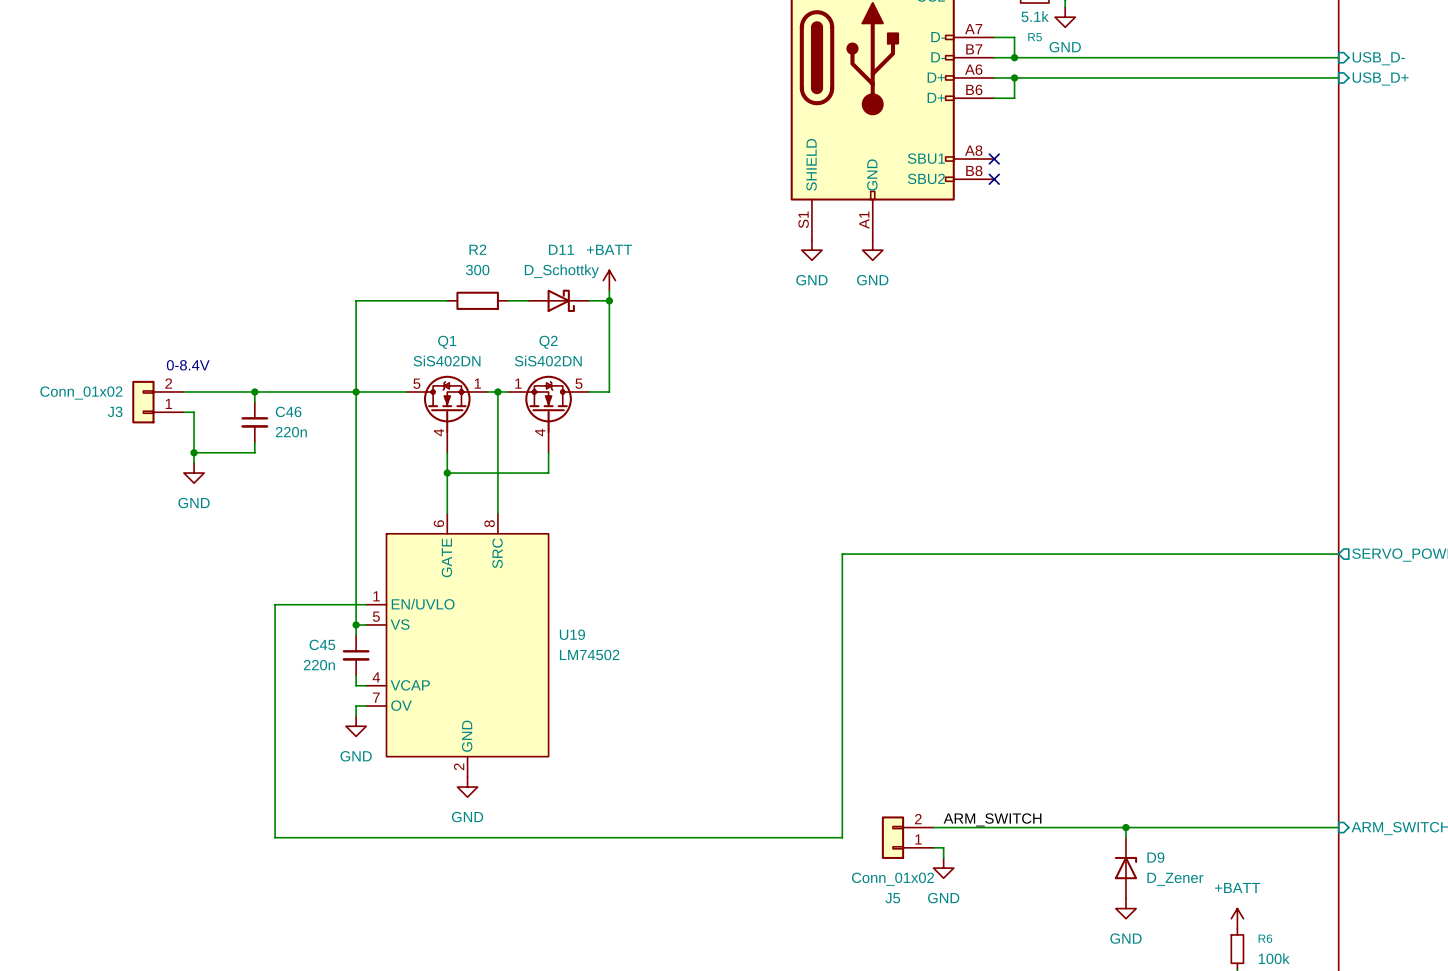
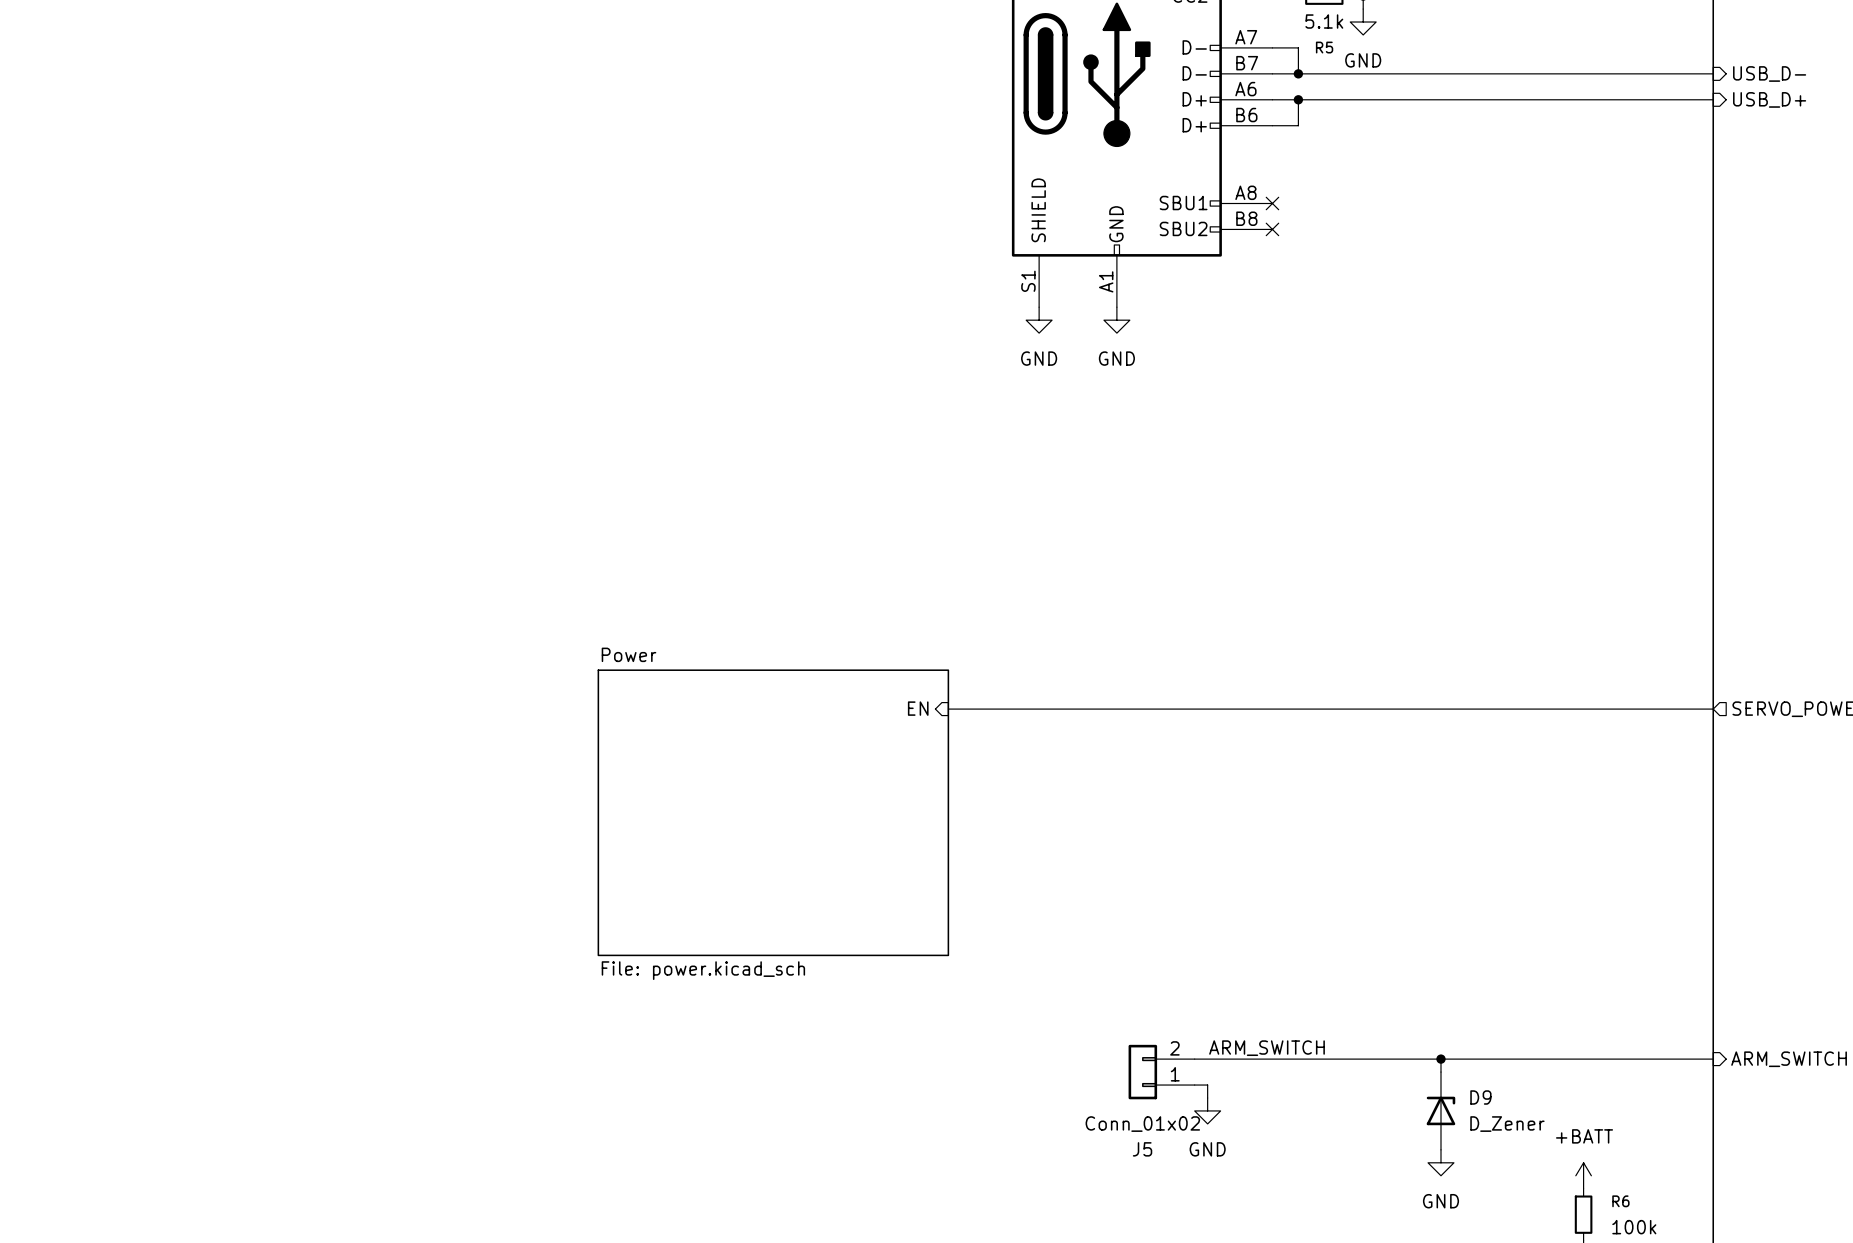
power symbol: +BATT (609, 280) -> none
wire: (609, 290) (609, 391) (589, 391) -> none
wire: (447, 300) (356, 300) (356, 635) -> none
R2: 300 (477, 300) -> none
wire: (508, 300) (528, 300) -> none
D11: D_Schottky (558, 300) -> none
wire: (589, 300) (609, 300) -> none
junction: (609, 300) -> none
text: 0-8.4V (188, 365) -> none
wire: (183, 391) (406, 391) -> none
wire: (254, 391) (254, 402) -> none
junction: (254, 391) -> none
junction: (356, 391) -> none
wire: (487, 391) (508, 391) -> none
wire: (497, 391) (497, 513) -> none
junction: (497, 391) -> none
J3: Conn_01x02 (158, 402) -> none
wire: (183, 412) (194, 412) (194, 462) -> none
Q1: SiS402DN (447, 414) -> none
Q2: SiS402DN (548, 414) -> none
C46: 220n (254, 422) -> none
wire: (254, 442) (254, 452) (194, 452) -> none
junction: (194, 452) -> none
wire: (447, 452) (447, 513) -> none
wire: (548, 452) (548, 473) (447, 473) -> none
power symbol: GND (194, 473) -> none
junction: (447, 473) -> none
sheet pin: none -> EN (918, 708)
wire: (842, 554) (842, 837) (275, 837) (275, 604) (366, 604) -> (1078, 709) (948, 709)
wire: (356, 624) (366, 624) -> none
junction: (356, 624) -> none
sheet Power: none -> File: power.kicad_sch (773, 812)
U19: LM74502 (457, 645) -> none
C45: 220n (356, 655) -> none
wire: (356, 675) (356, 685) (366, 685) -> none
wire: (366, 706) (356, 706) (356, 716) -> none
power symbol: GND (356, 726) -> none
power symbol: GND (467, 787) -> none

